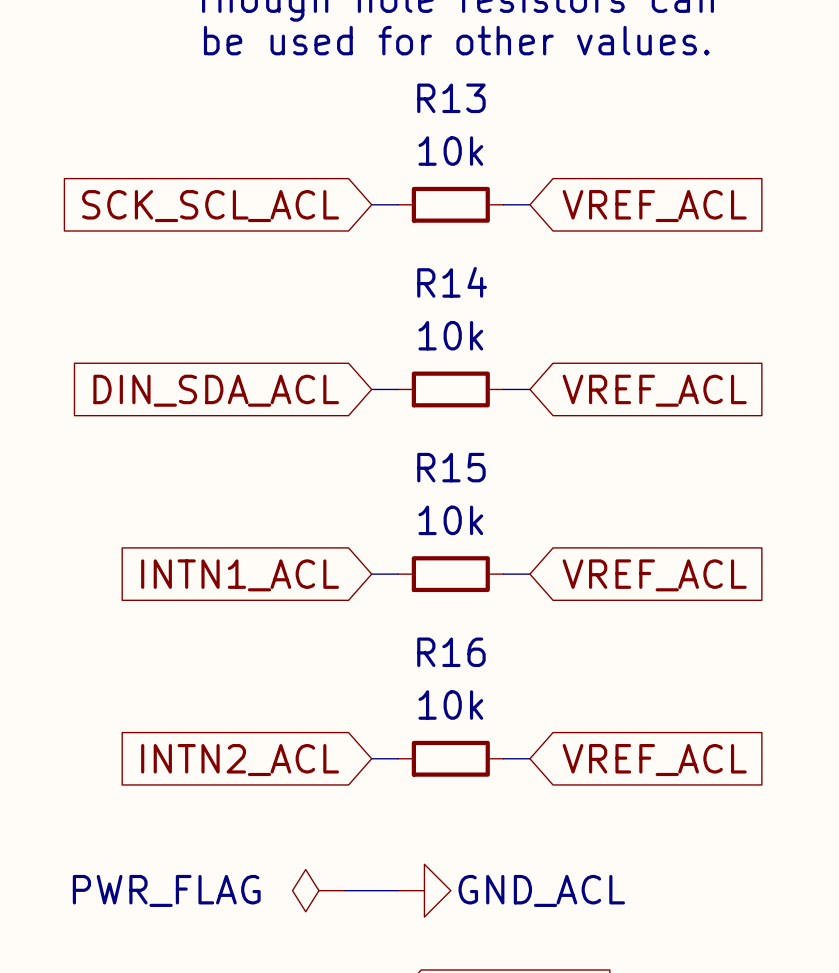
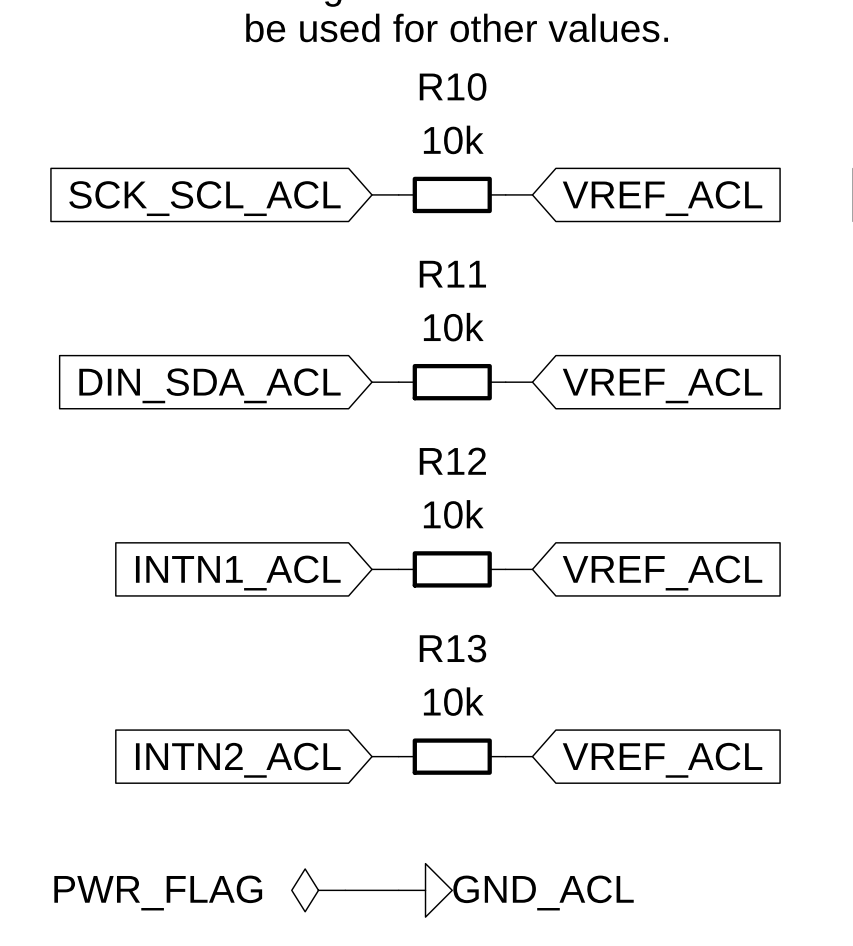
R13 name: R13 (451, 98) -> R10 (453, 86)
R14 name: R14 (452, 282) -> R11 (452, 274)
R15 name: R15 (451, 467) -> R12 (452, 461)
R16 name: R16 (451, 652) -> R13 (453, 648)

